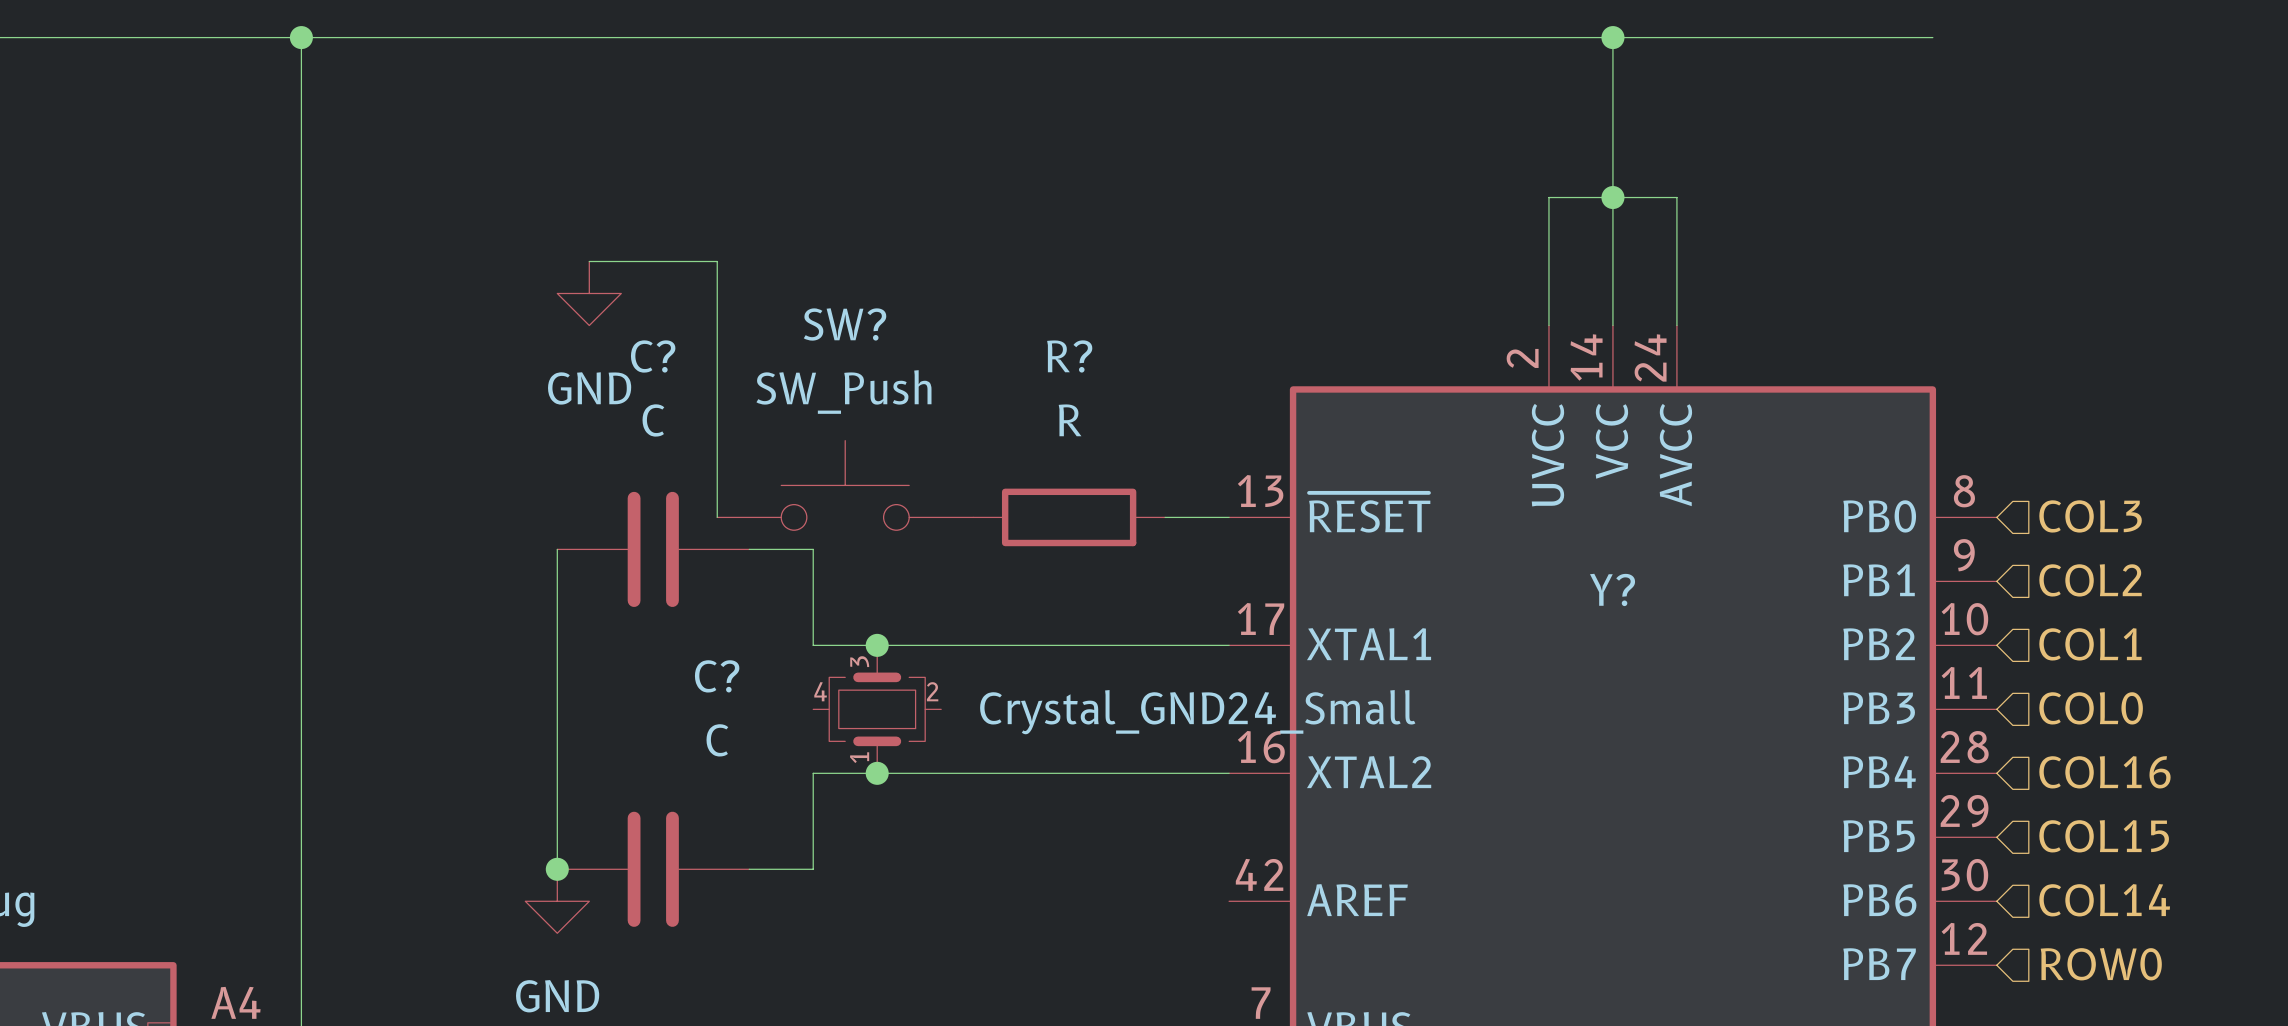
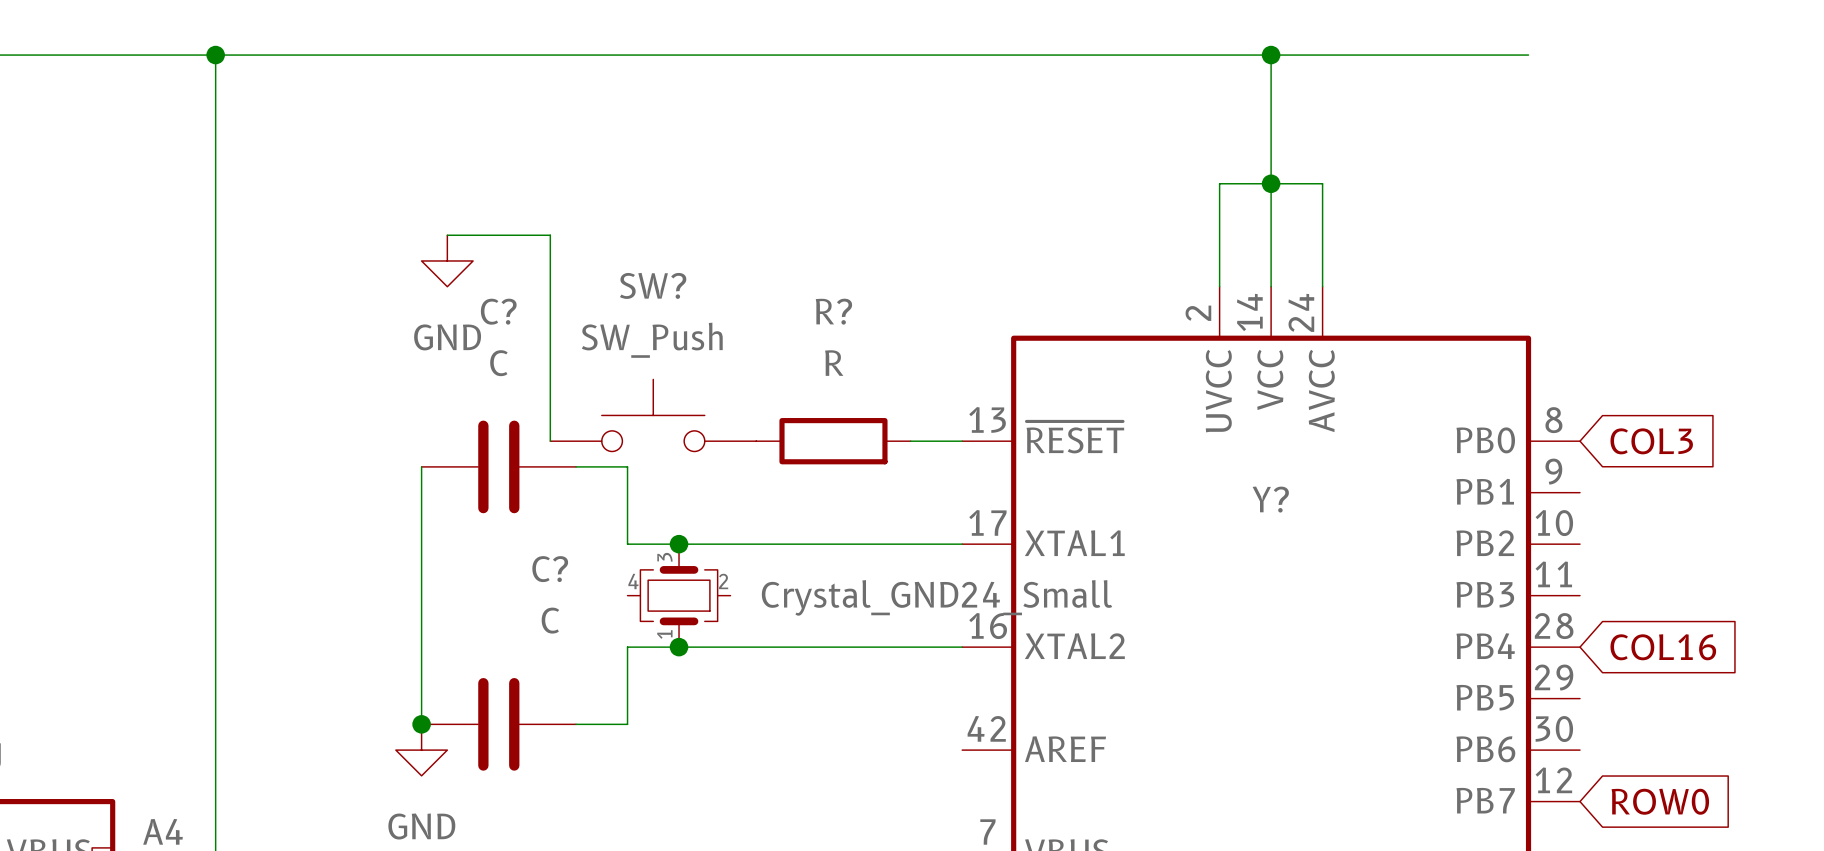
hierarchical label: COL3 (2090, 516) -> none
global label: none -> COL3 (1651, 441)
hierarchical label: COL2 (2090, 580) -> none
hierarchical label: COL1 (2090, 644) -> none
hierarchical label: COL0 (2091, 708) -> none
hierarchical label: COL16 (2104, 772) -> none
global label: none -> COL16 (1663, 647)
hierarchical label: COL15 (2104, 836) -> none
hierarchical label: COL14 (2104, 900) -> none
hierarchical label: ROW0 (2101, 964) -> none
global label: none -> ROW0 (1660, 801)

